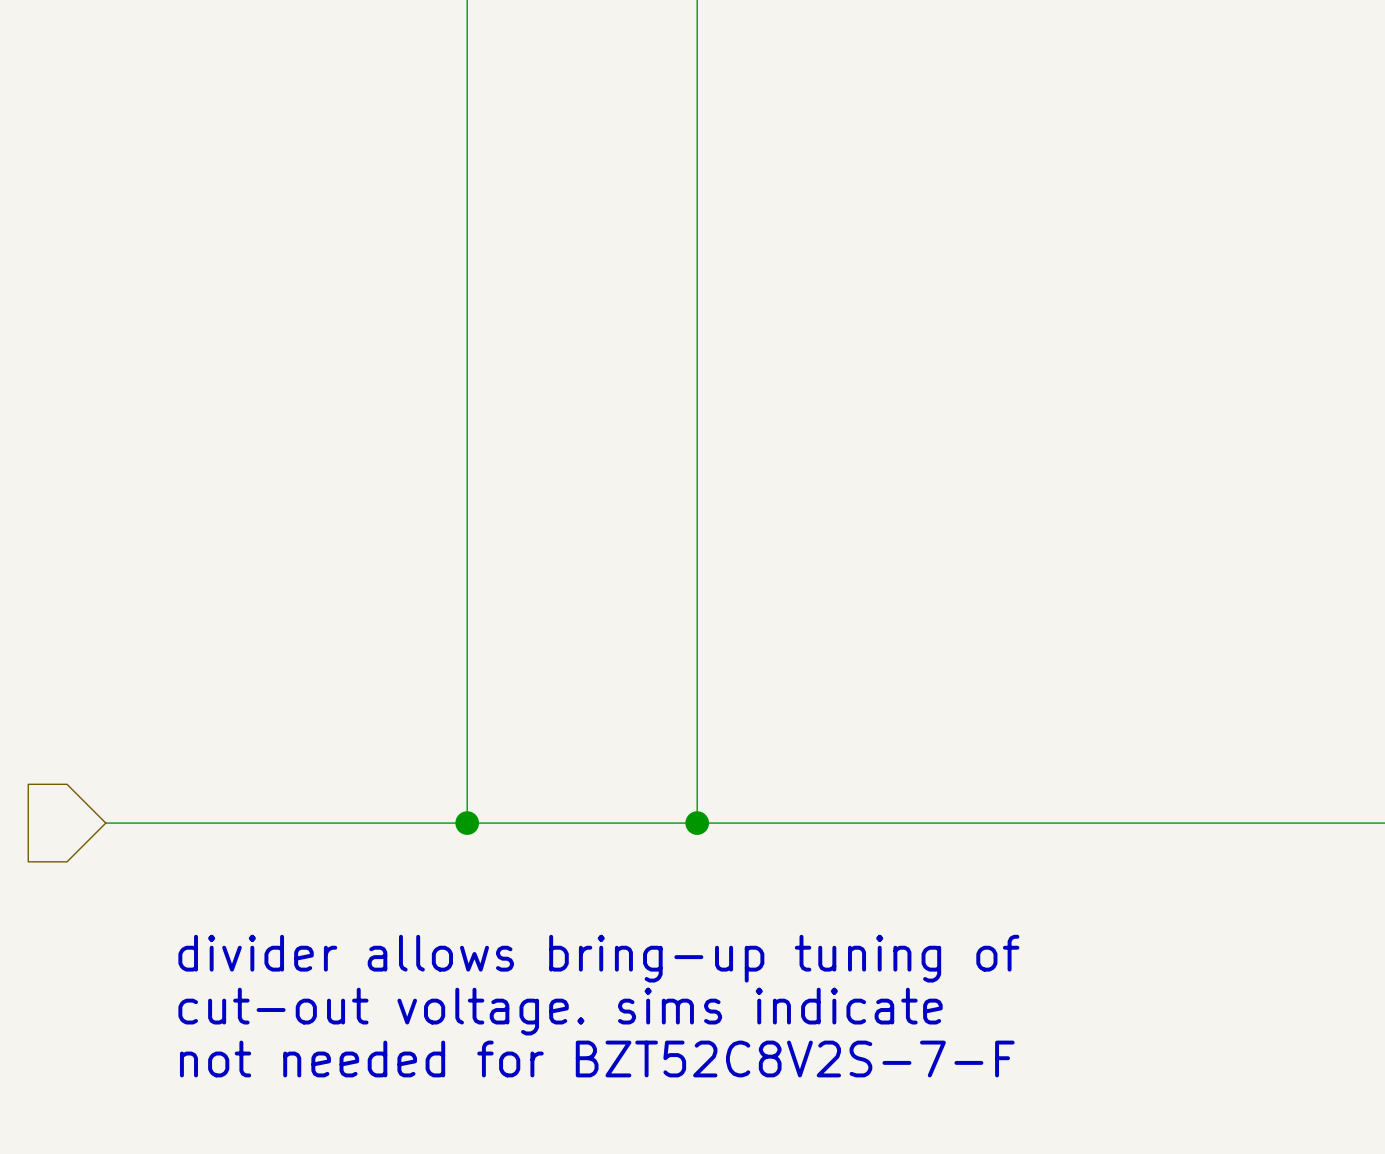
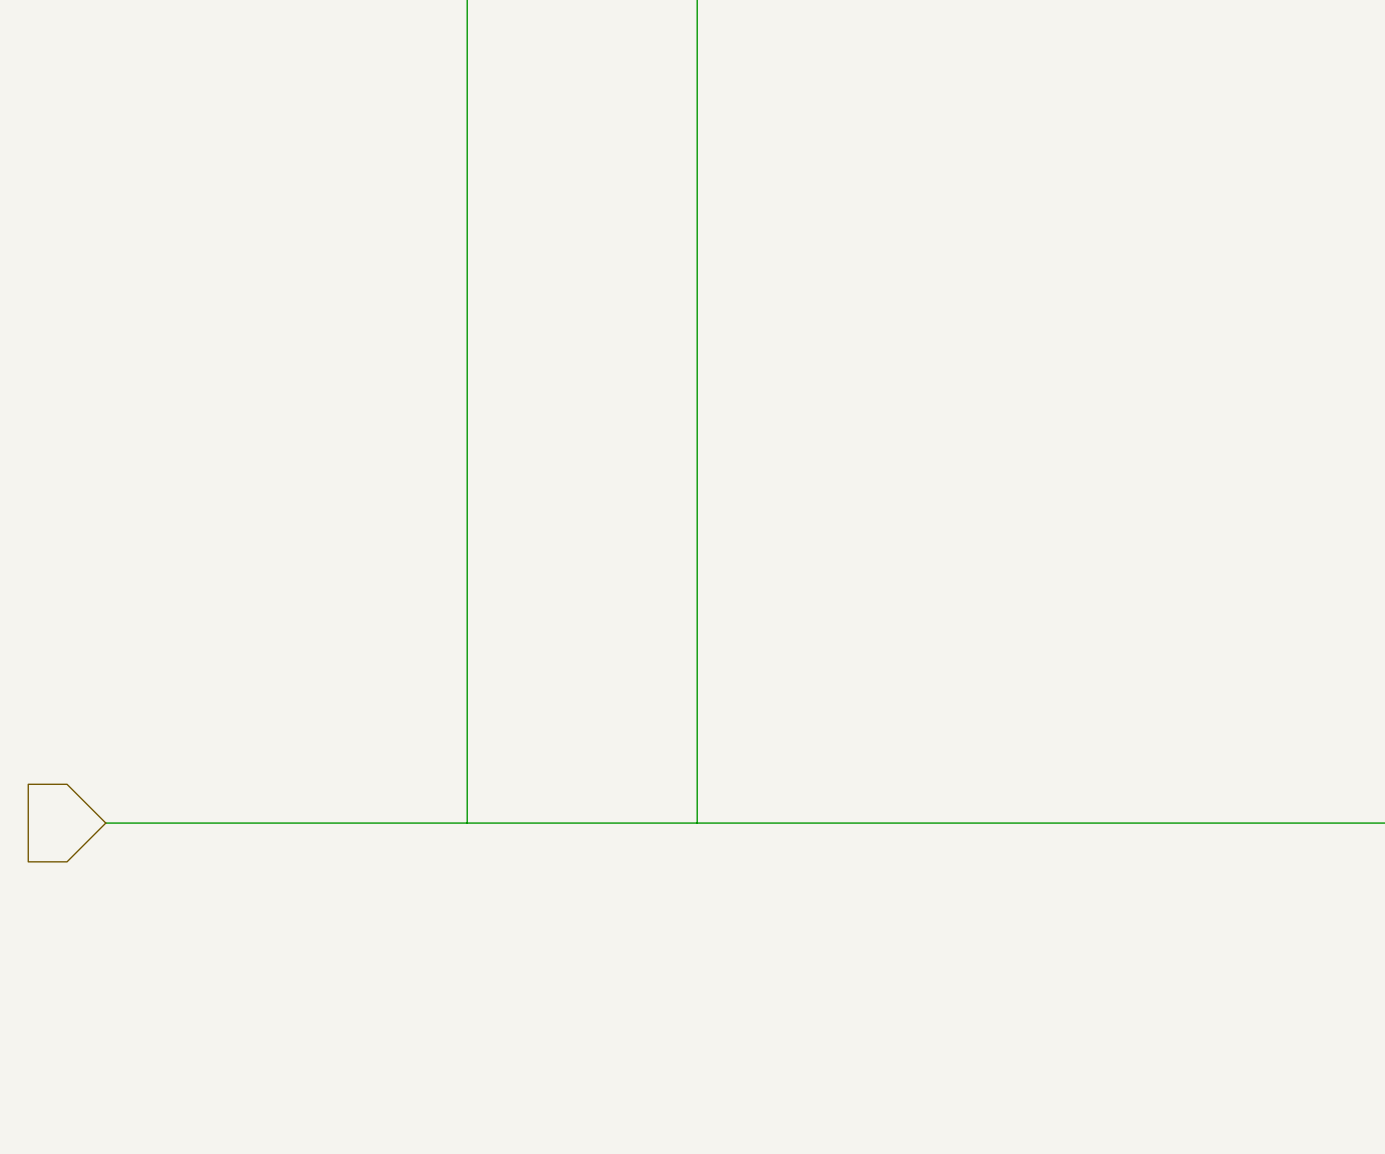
junction: (467, 823) -> none
junction: (697, 823) -> none
text: divider allows bring-up tuning of (598, 958) -> none
text: cut-out voltage. sims indicate (560, 1011) -> none
text: not needed for BZT52C8V2S-7-F (597, 1059) -> none

